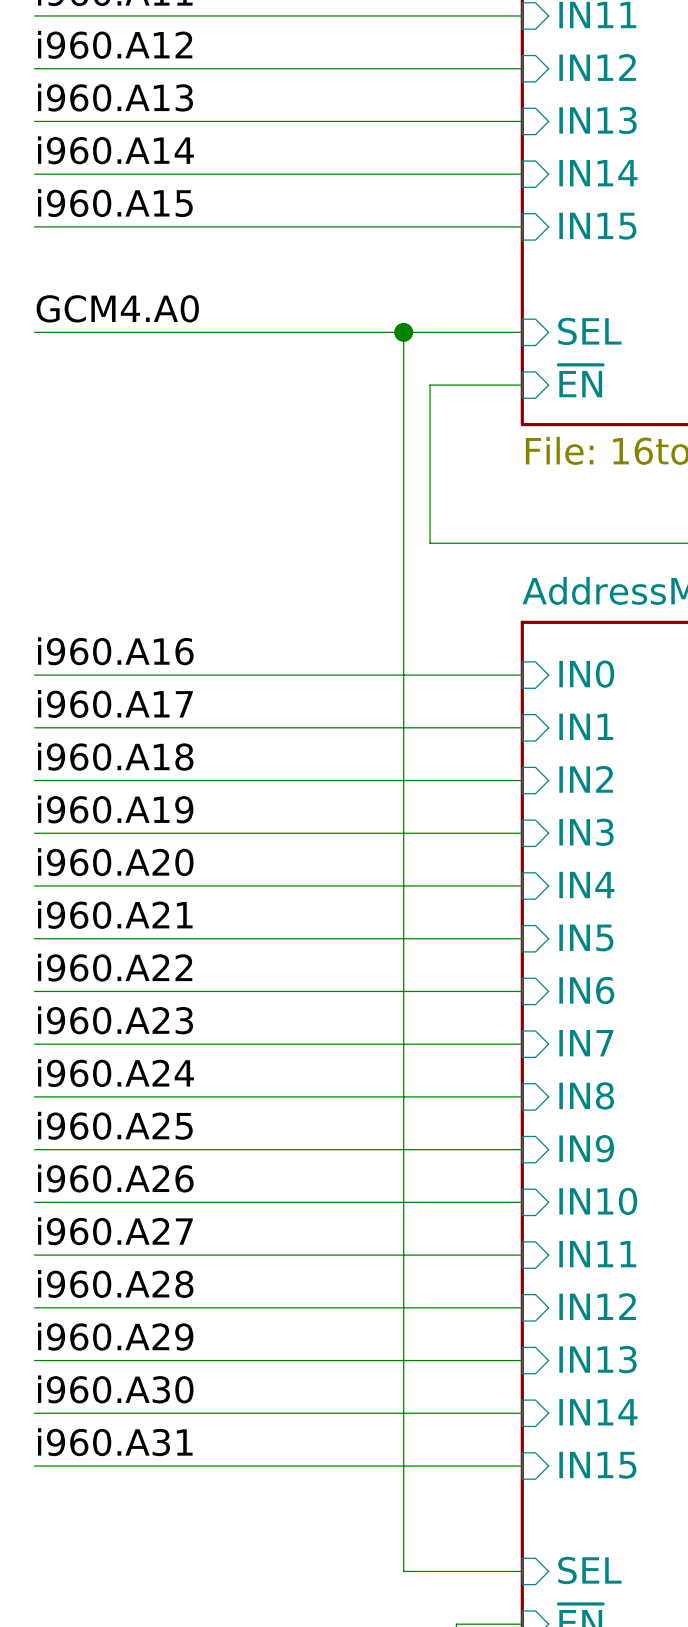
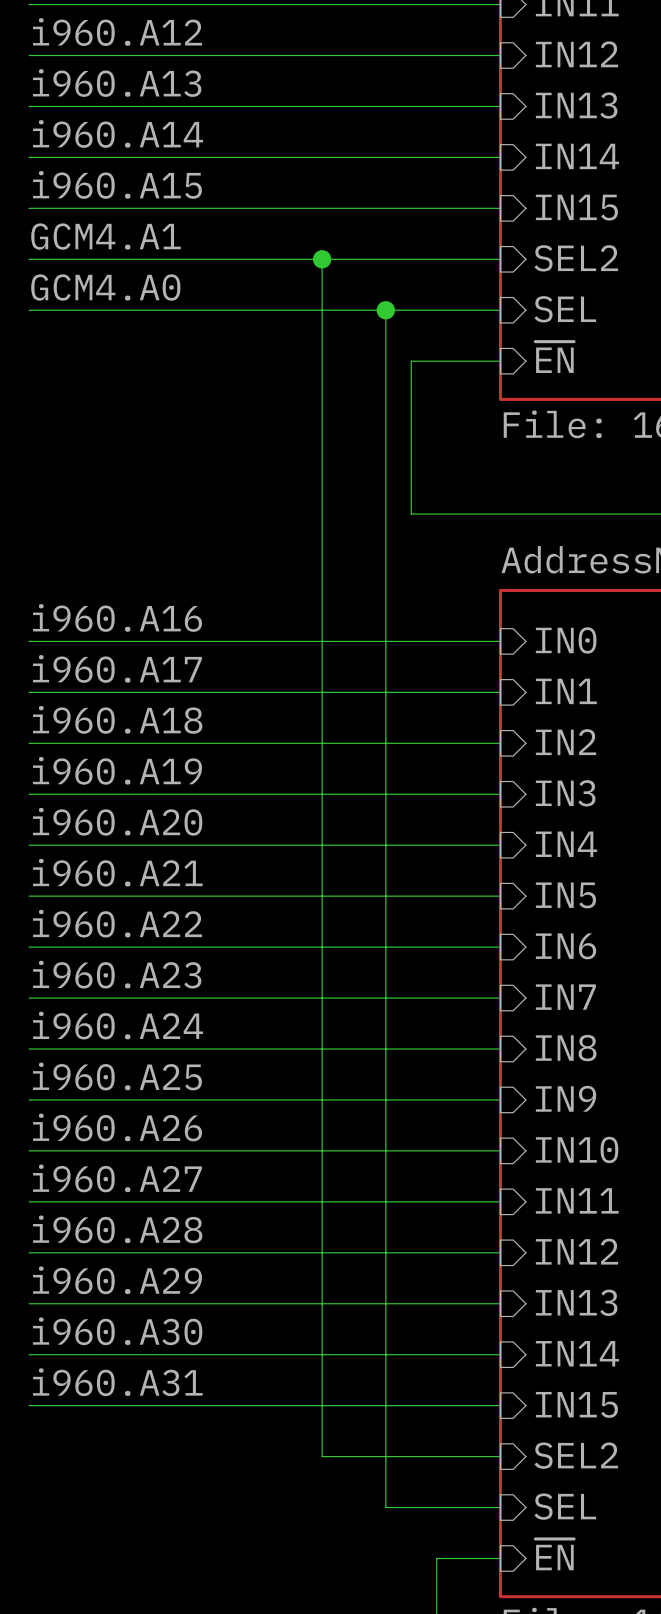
label: none -> GCM4.A1 (105, 236)
sheet pin: none -> SEL2 (576, 258)
wire: none -> (29, 259) (500, 259)
wire: none -> (322, 259) (322, 1456) (500, 1456)
junction: none -> (322, 259)
sheet pin: none -> SEL2 (576, 1455)

